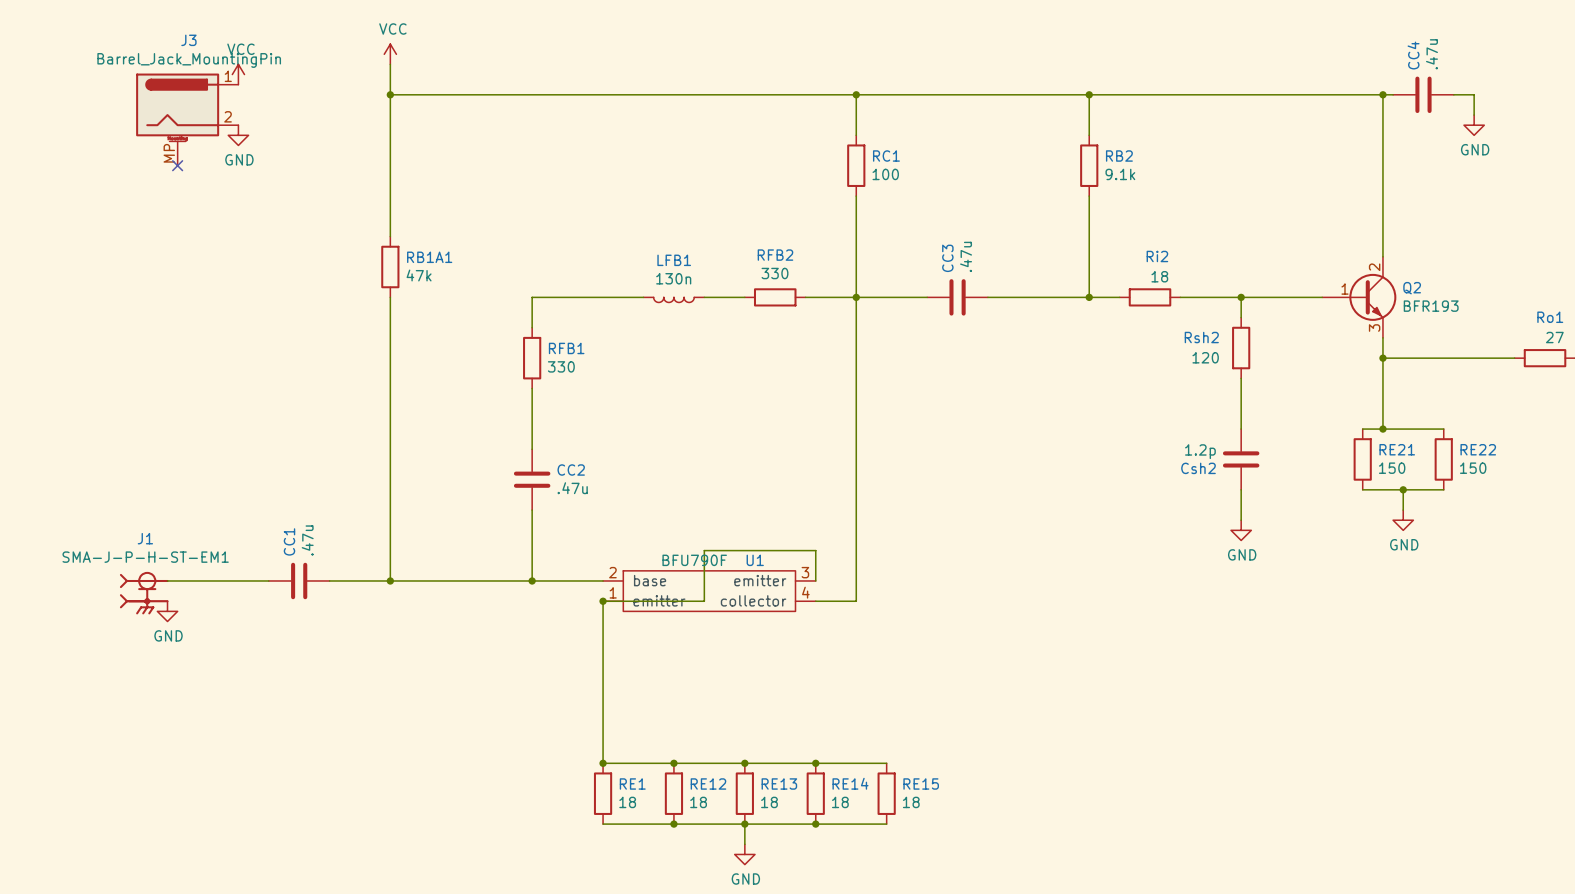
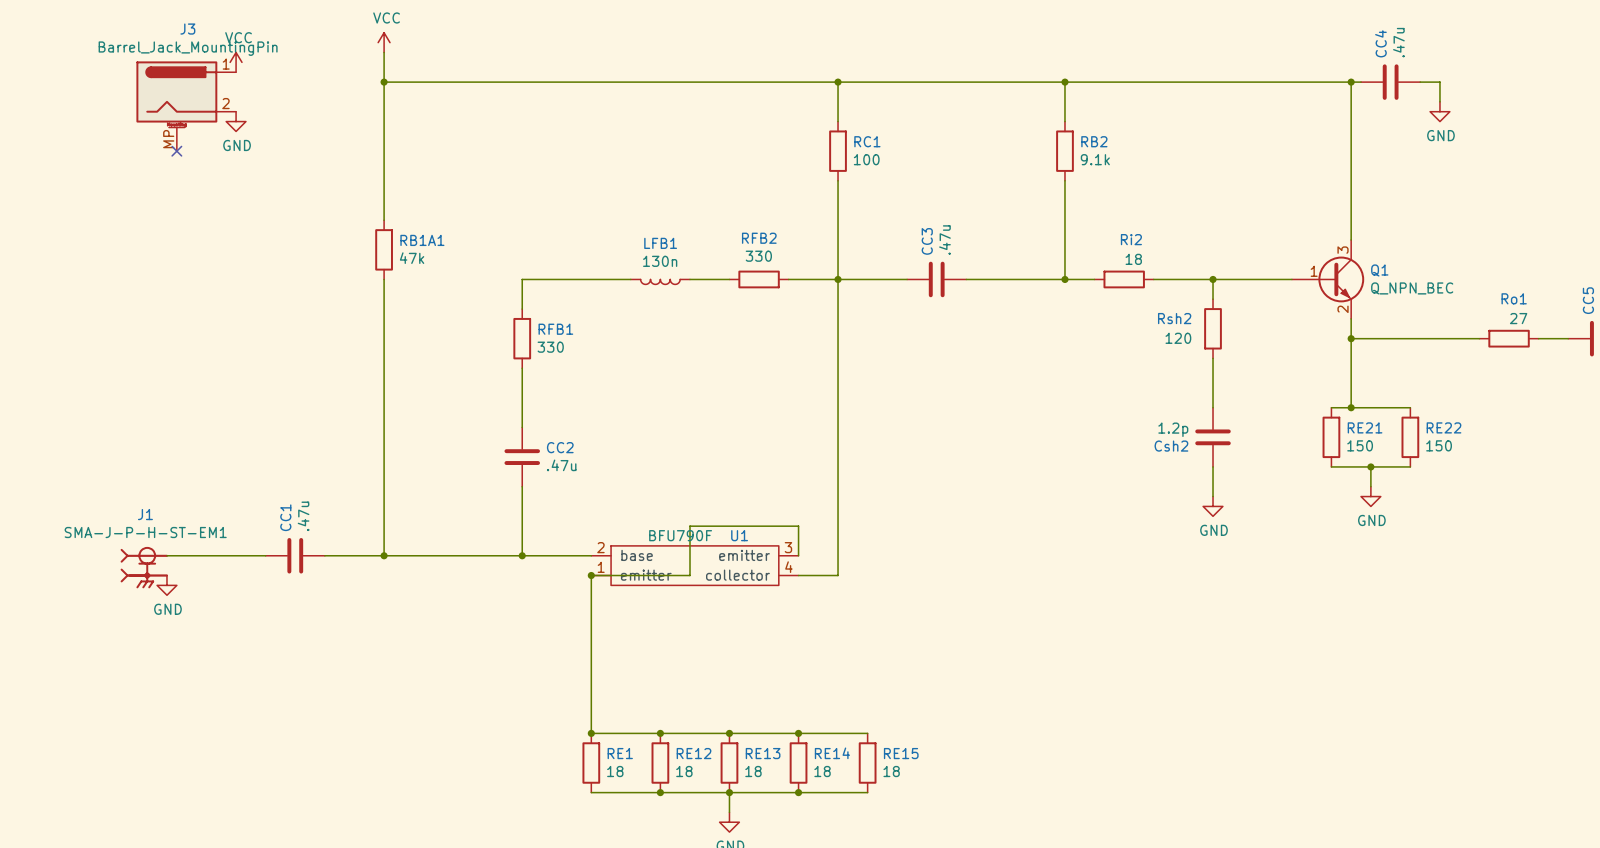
Q2 pin number: 2 (1374, 267) -> 3 (1343, 250)
Q2 name: Q2 (1412, 288) -> Q1 (1379, 270)
Q2 value: BFR193 (1431, 306) -> Q_NPN_BEC (1412, 288)
Q2 pin number: 3 (1374, 328) -> 2 (1343, 309)

